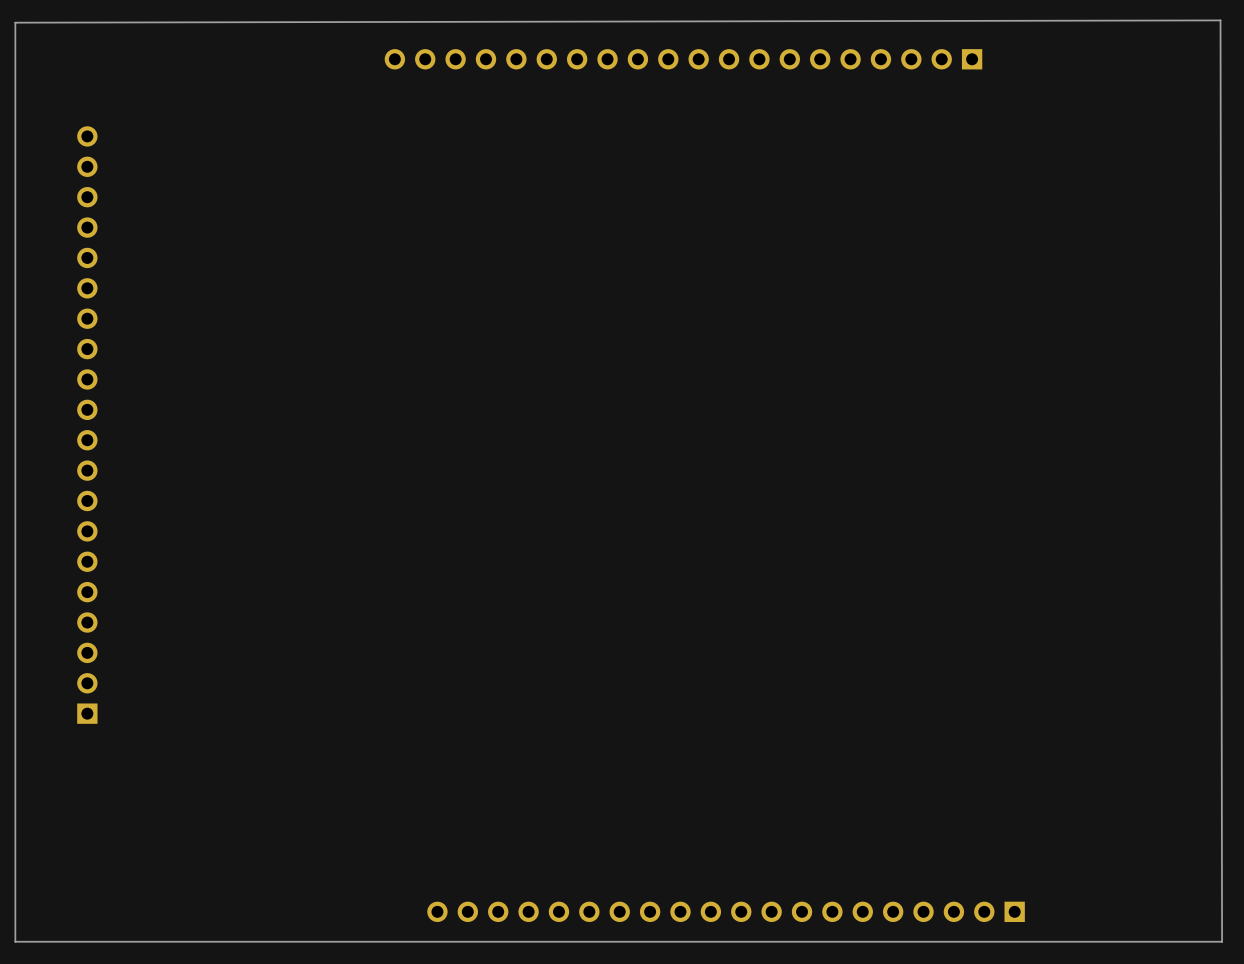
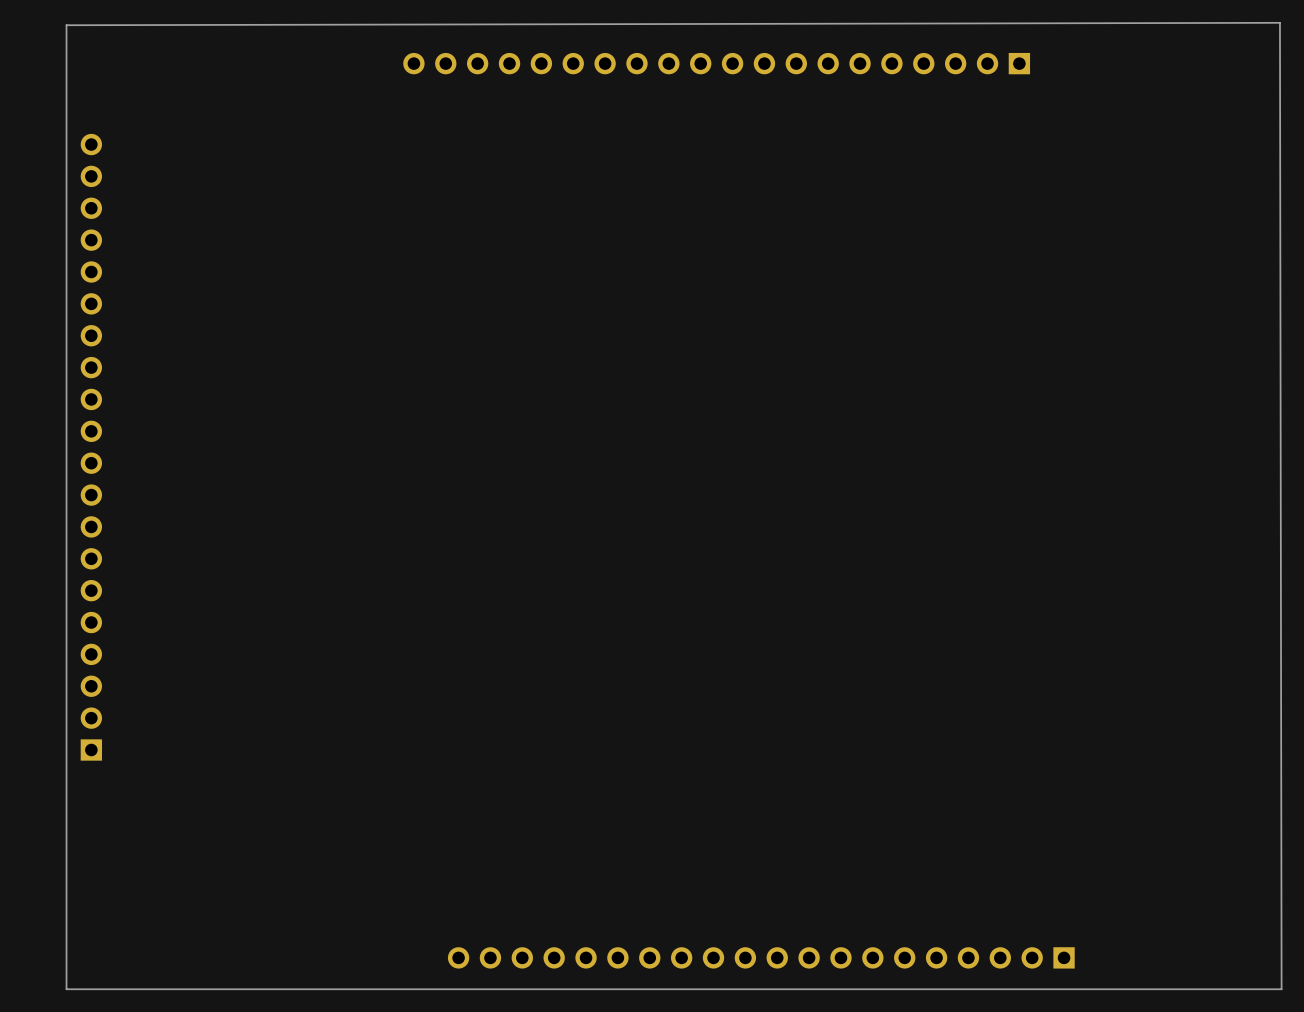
board edge: (1220, 20) (15, 22) (15, 941) (63, 941) -> (1279, 22) (66, 25) (66, 989)

